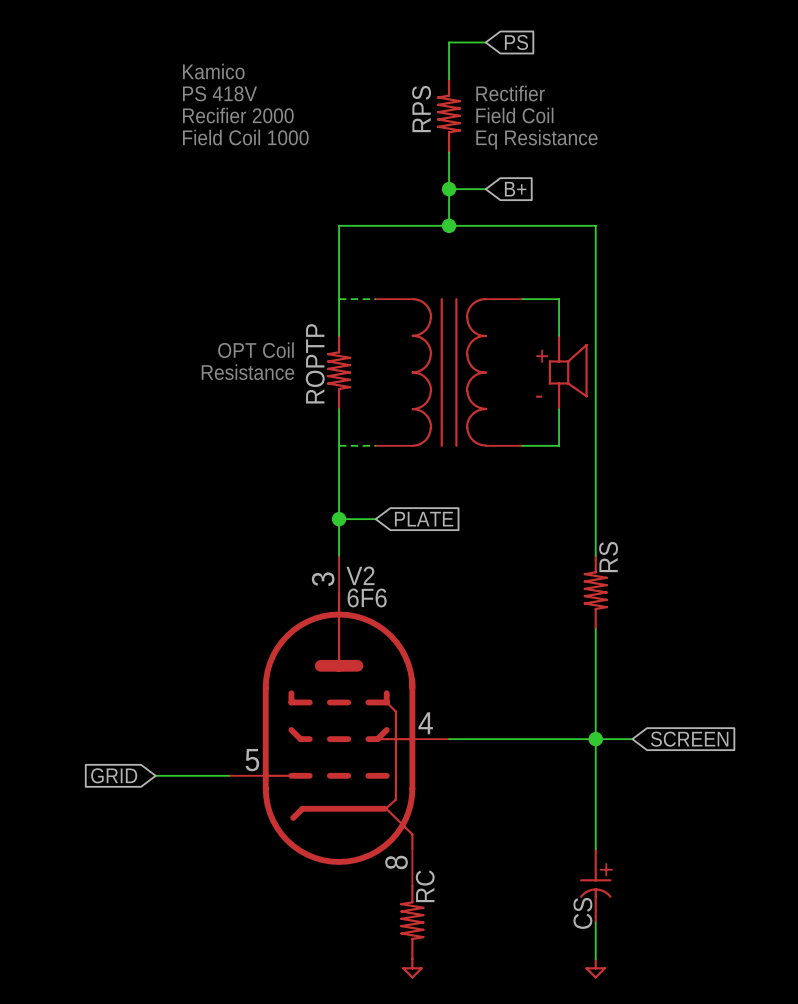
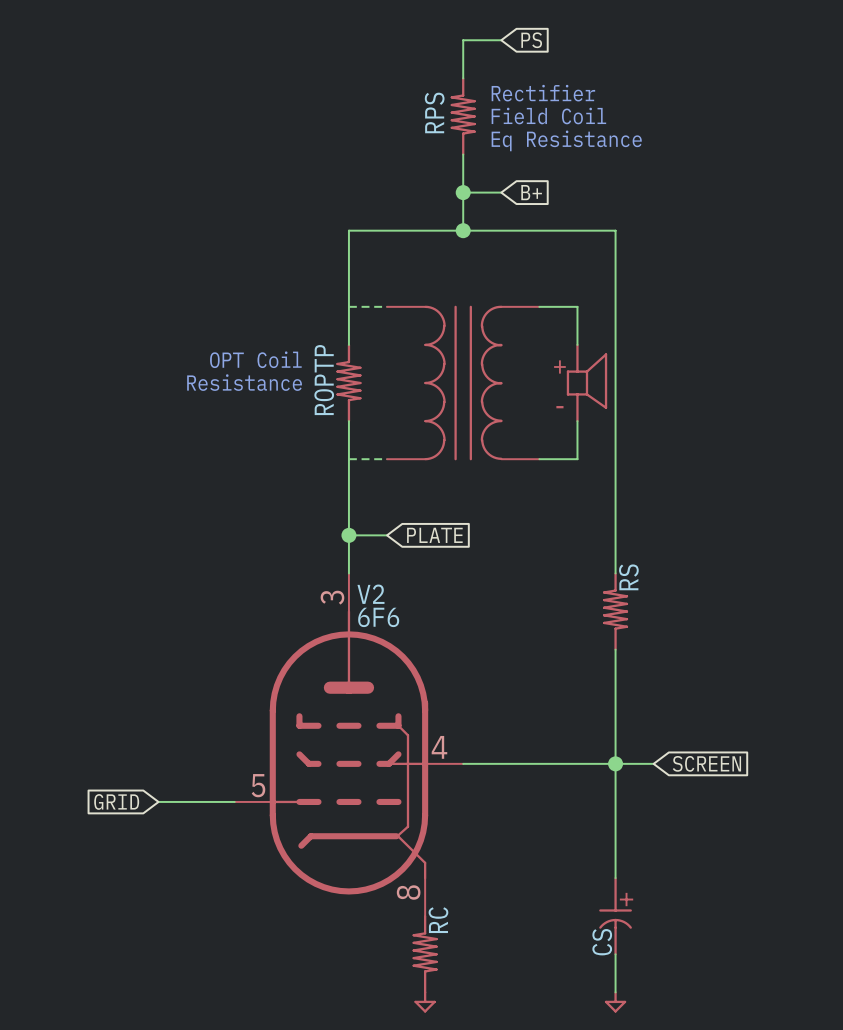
text: Kamico (213, 71) -> none
text: PS 418V (220, 93) -> none
text: Recifier 2000 (238, 115) -> none
text: Field Coil 1000 (245, 137) -> none

